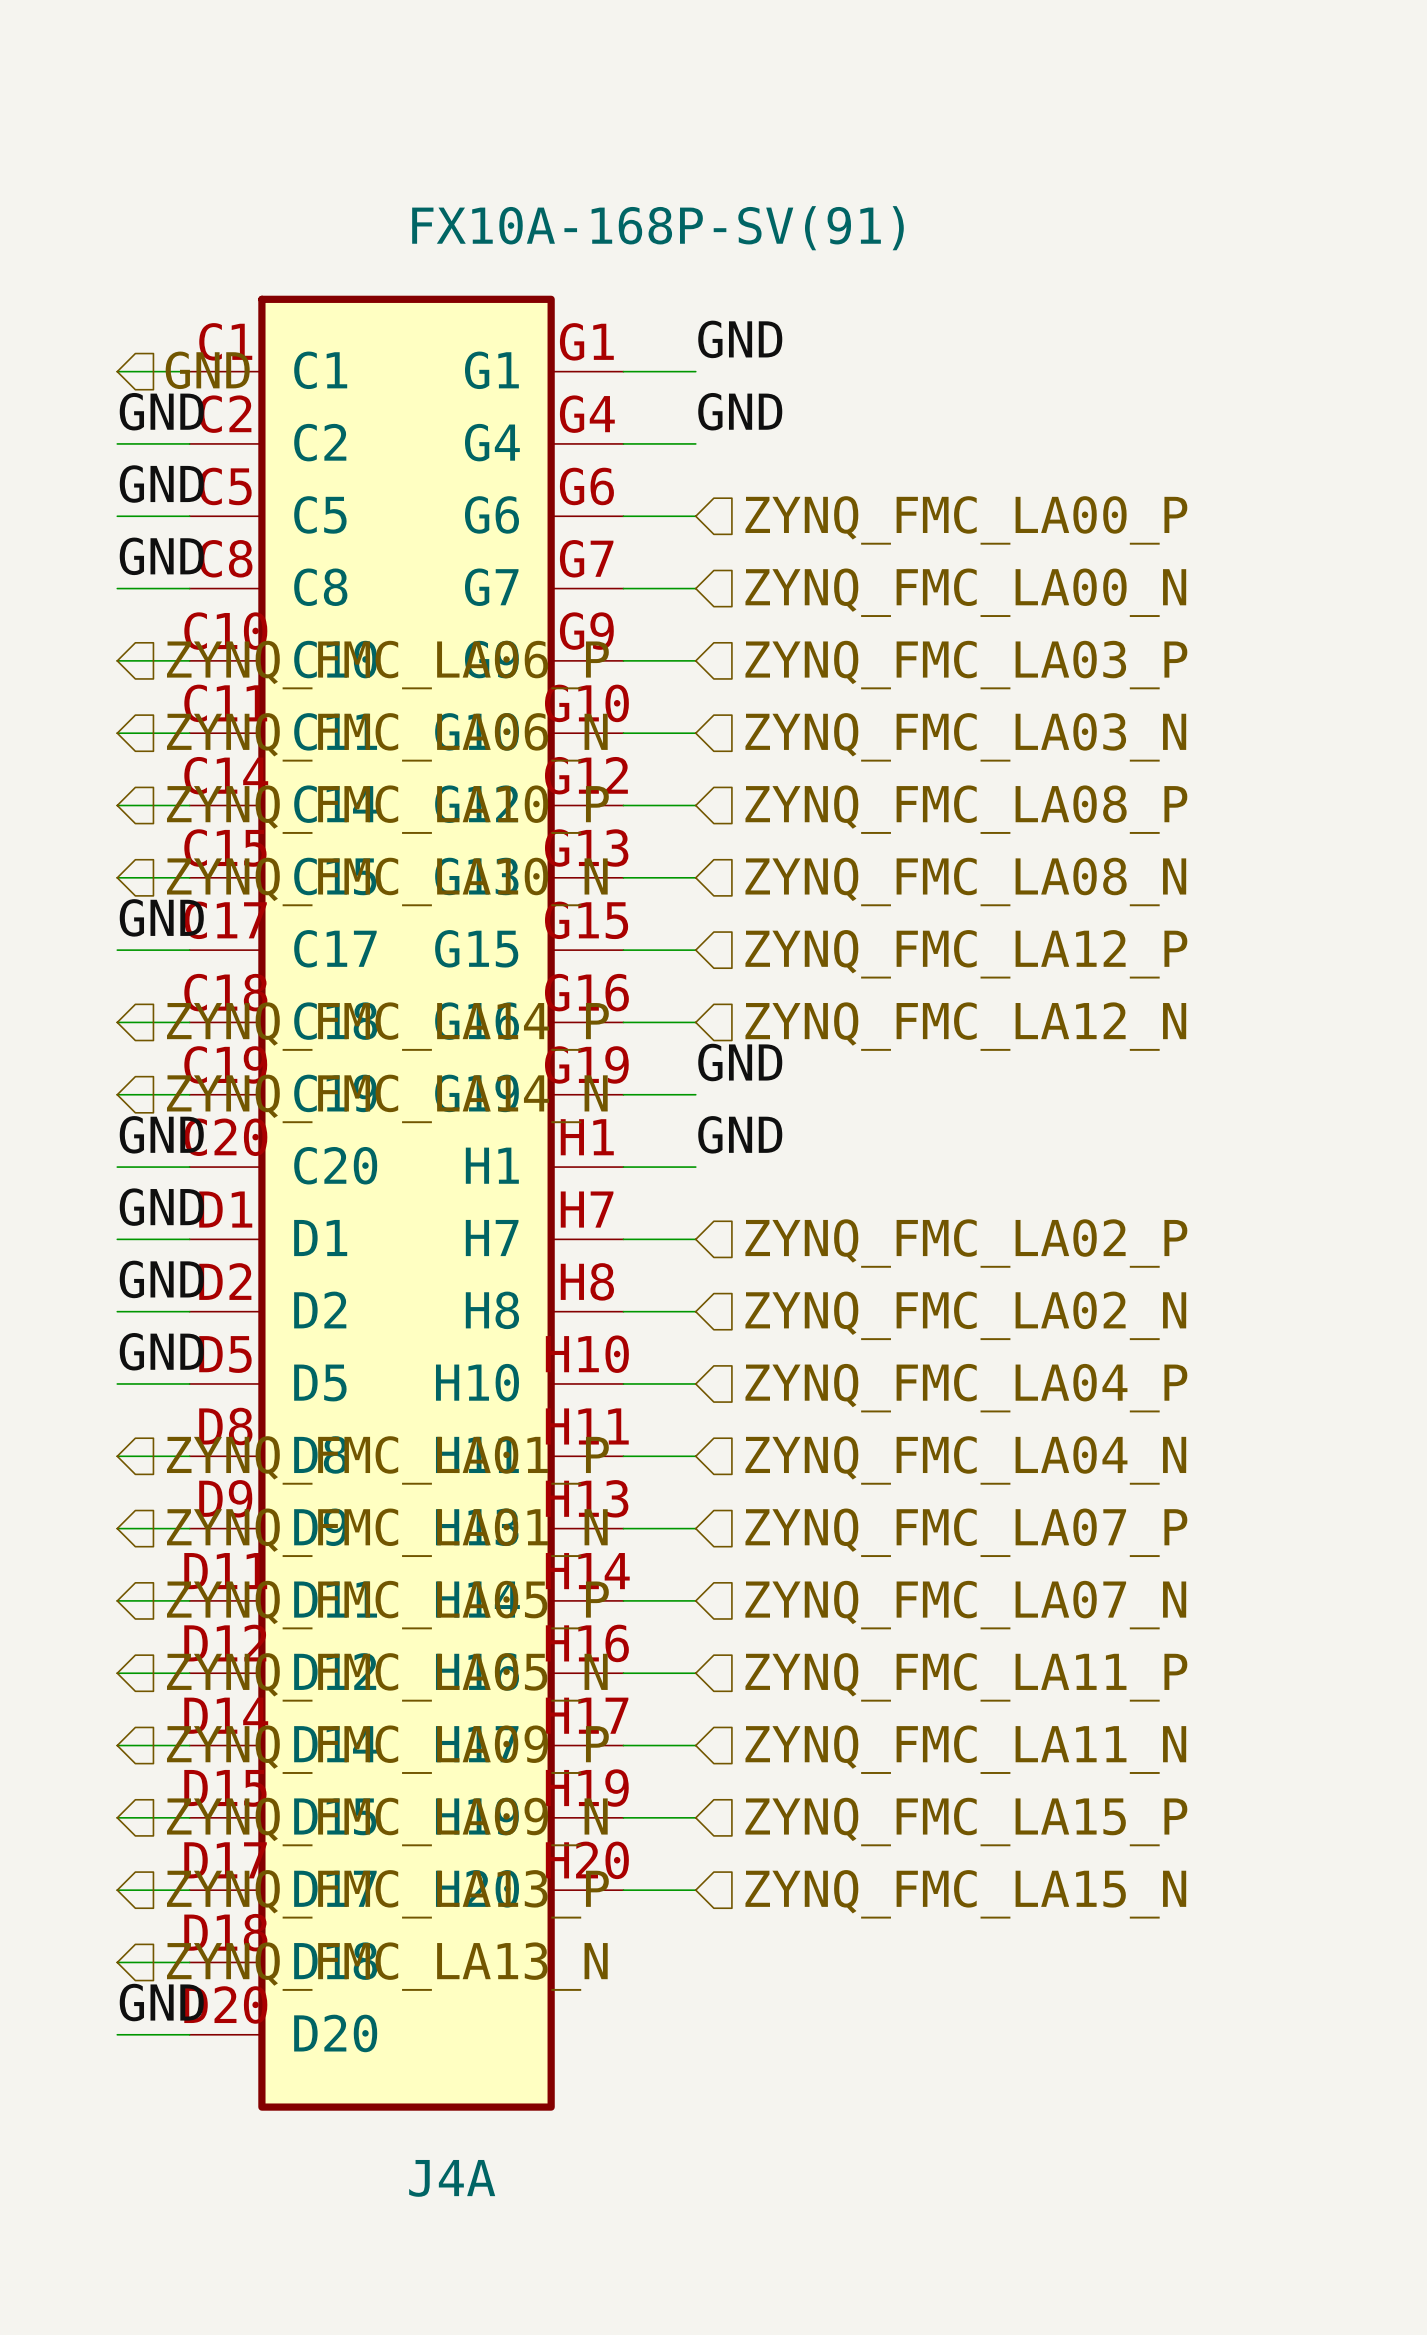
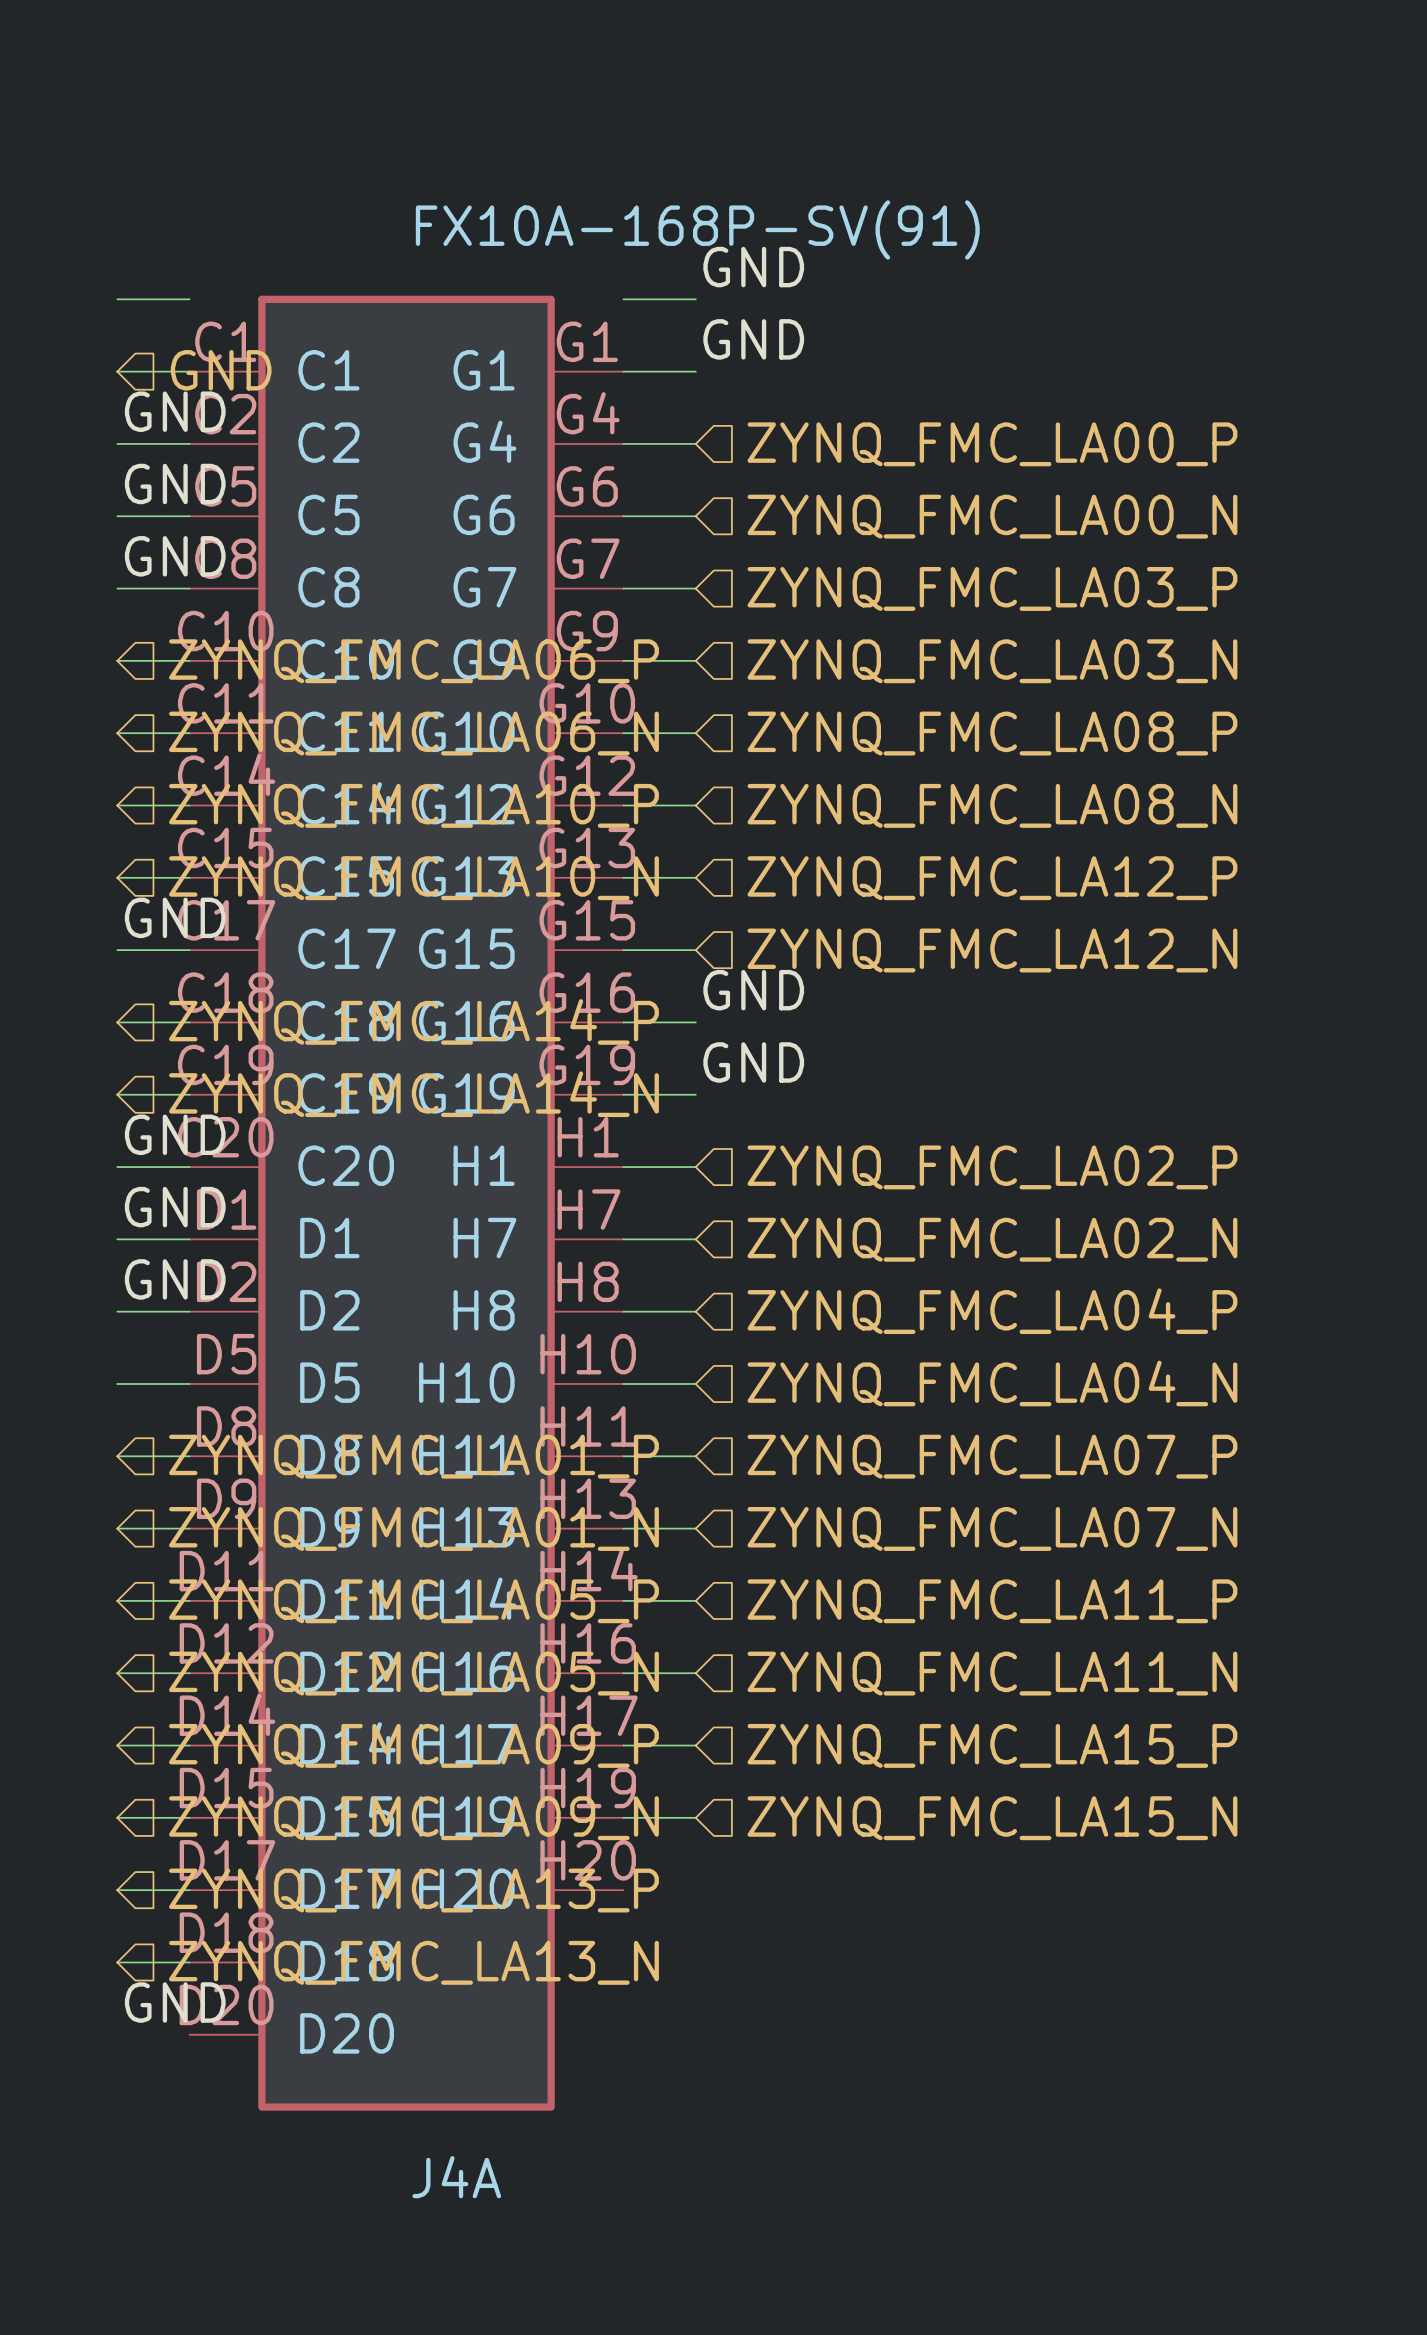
wire: none -> (117, 299) (189, 299)
wire: none -> (623, 299) (695, 299)
label position: GND (740, 411) -> GND (753, 267)
hierarchical label: none -> ZYNQ_FMC_LA00_P (992, 444)
hierarchical label: ZYNQ_FMC_LA00_P (966, 520) -> ZYNQ_FMC_LA00_N (992, 516)
hierarchical label: ZYNQ_FMC_LA00_N (965, 592) -> ZYNQ_FMC_LA03_P (992, 588)
hierarchical label: ZYNQ_FMC_LA03_P (966, 665) -> ZYNQ_FMC_LA03_N (992, 661)
hierarchical label: ZYNQ_FMC_LA03_N (965, 737) -> ZYNQ_FMC_LA08_P (992, 733)
hierarchical label: ZYNQ_FMC_LA08_P (966, 809) -> ZYNQ_FMC_LA08_N (992, 805)
hierarchical label: ZYNQ_FMC_LA08_N (965, 881) -> ZYNQ_FMC_LA12_P (992, 878)
hierarchical label: ZYNQ_FMC_LA12_P (966, 954) -> ZYNQ_FMC_LA12_N (992, 950)
hierarchical label: ZYNQ_FMC_LA12_N (965, 1026) -> none
label position: GND (740, 1134) -> GND (753, 990)
hierarchical label: none -> ZYNQ_FMC_LA02_P (992, 1167)
hierarchical label: ZYNQ_FMC_LA02_P (966, 1243) -> ZYNQ_FMC_LA02_N (992, 1239)
hierarchical label: ZYNQ_FMC_LA02_N (965, 1315) -> ZYNQ_FMC_LA04_P (992, 1311)
label: GND (161, 1351) -> none
hierarchical label: ZYNQ_FMC_LA04_P (966, 1388) -> ZYNQ_FMC_LA04_N (992, 1383)
hierarchical label: ZYNQ_FMC_LA04_N (965, 1460) -> ZYNQ_FMC_LA07_P (992, 1456)
hierarchical label: ZYNQ_FMC_LA07_P (966, 1532) -> ZYNQ_FMC_LA07_N (992, 1528)
hierarchical label: ZYNQ_FMC_LA07_N (965, 1605) -> ZYNQ_FMC_LA11_P (992, 1601)
hierarchical label: ZYNQ_FMC_LA11_P (966, 1677) -> ZYNQ_FMC_LA11_N (992, 1673)
hierarchical label: ZYNQ_FMC_LA11_N (965, 1749) -> ZYNQ_FMC_LA15_P (992, 1745)
hierarchical label: ZYNQ_FMC_LA15_P (966, 1822) -> ZYNQ_FMC_LA15_N (992, 1818)
wire: (623, 1890) (695, 1890) -> none
hierarchical label: ZYNQ_FMC_LA15_N (965, 1894) -> none
wire: (117, 2034) (189, 2034) -> none

